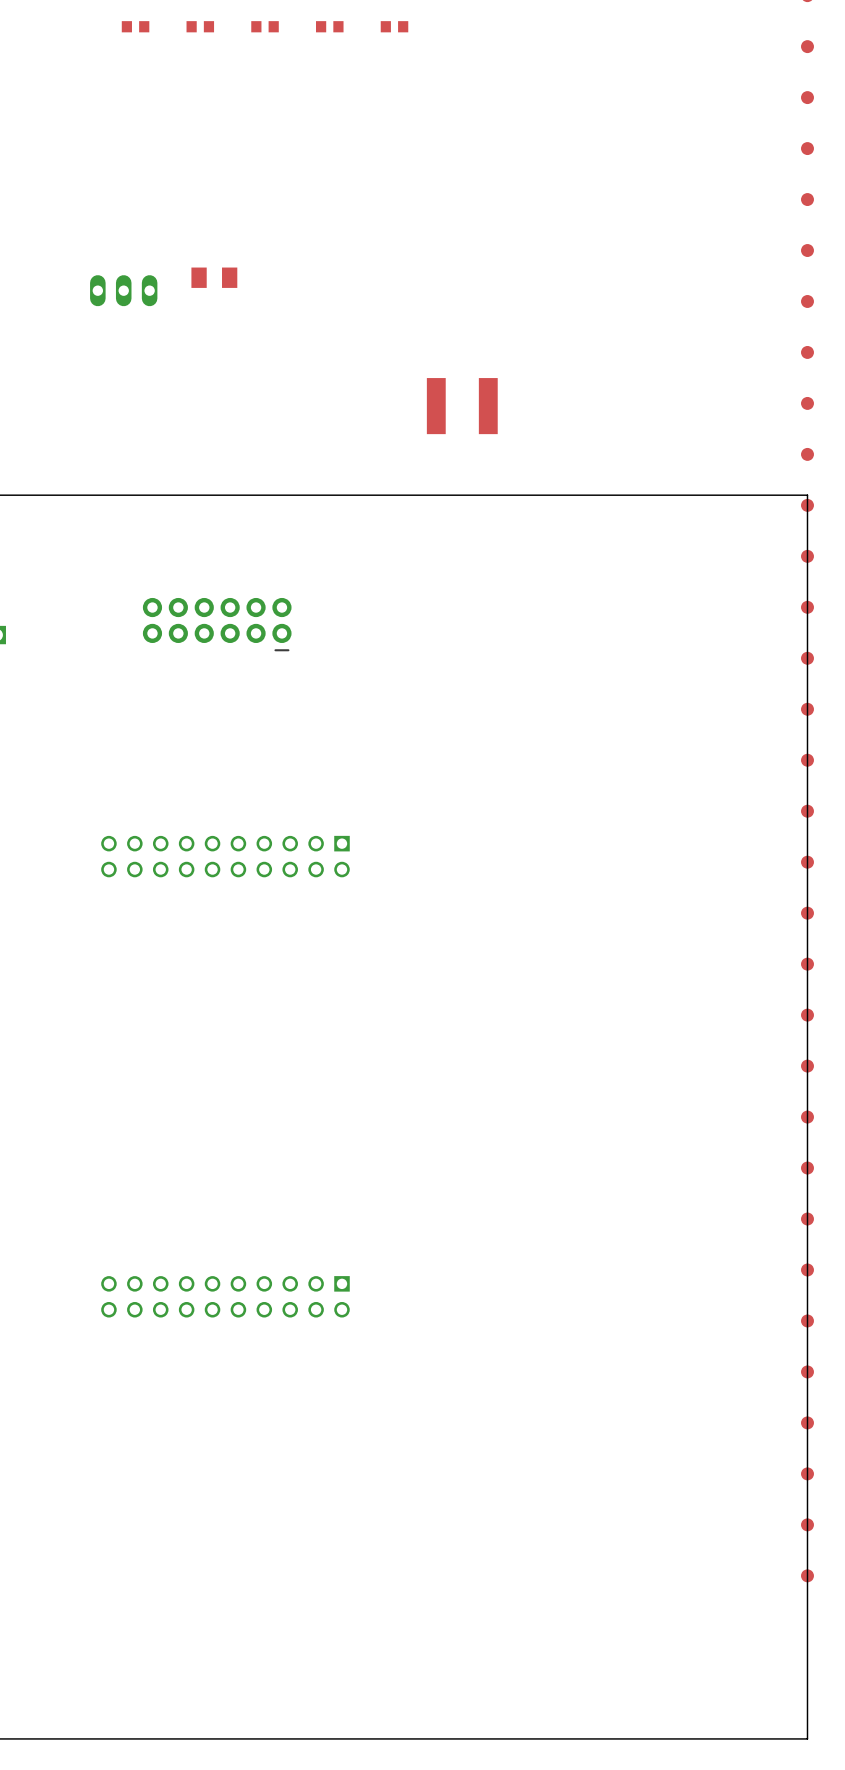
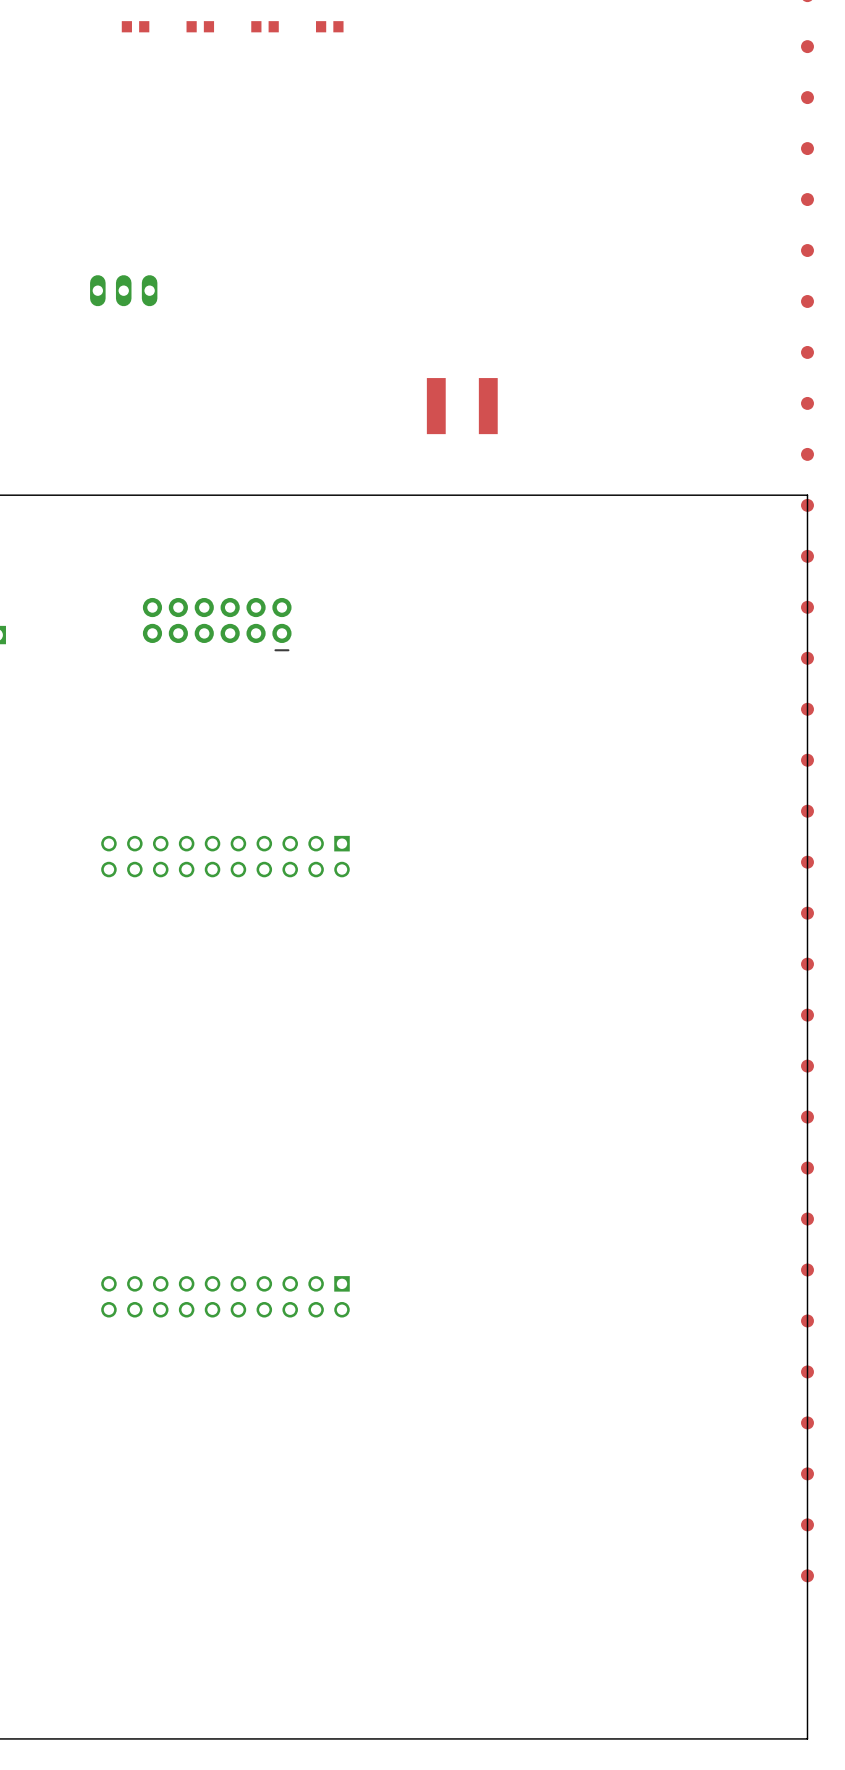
part: (394, 26) -> none
part: (214, 277) -> none

